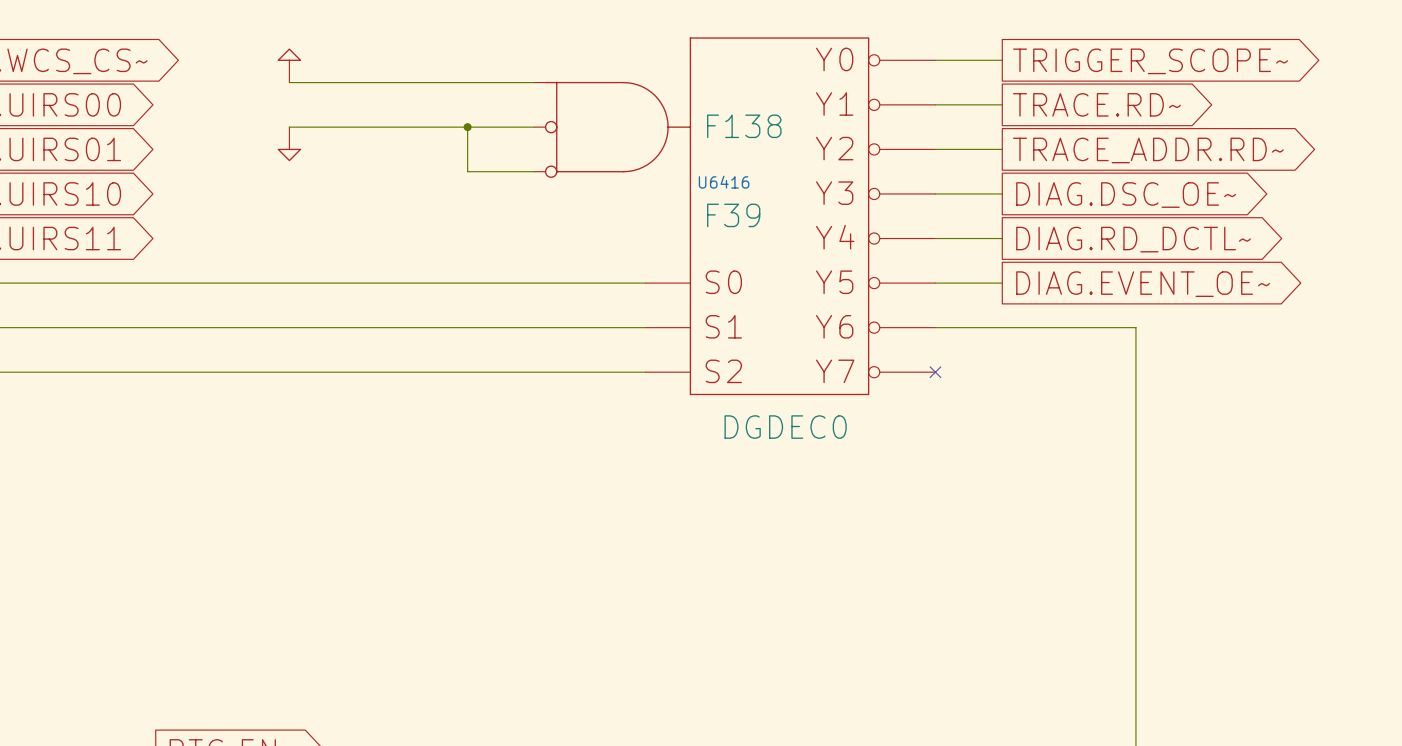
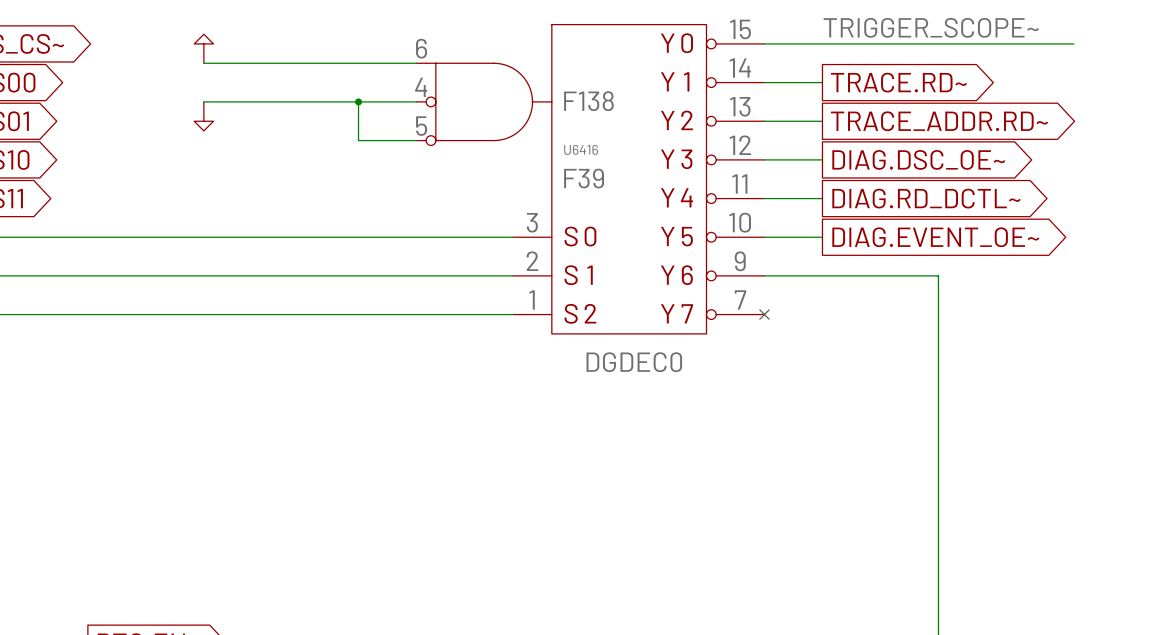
U6416 symbol: [534, 37, 936, 396] -> [416, 24, 765, 335]
label: none -> TRIGGER_SCOPE~ (931, 27)
wire: none -> (822, 43) (1073, 43)
global label: TRIGGER_SCOPE~ (1150, 61) -> none

